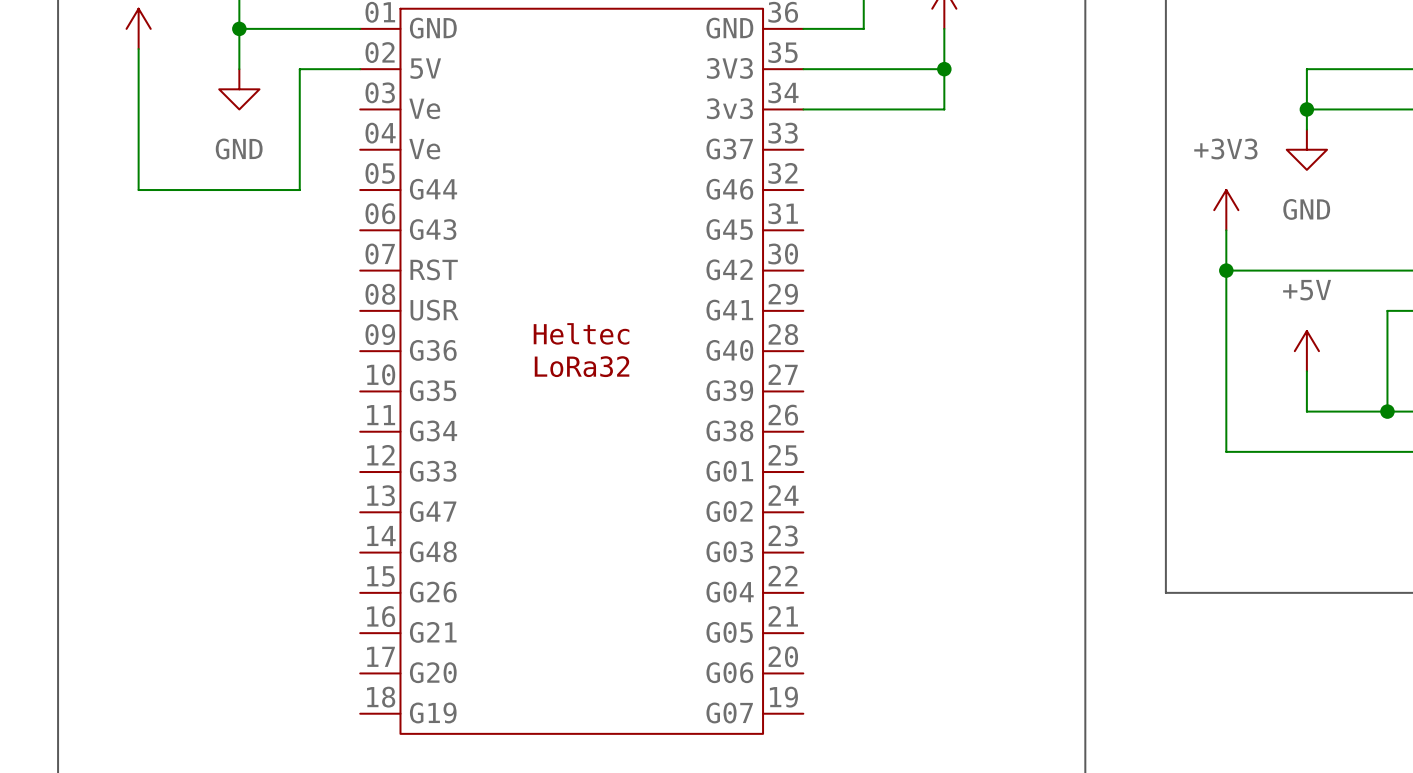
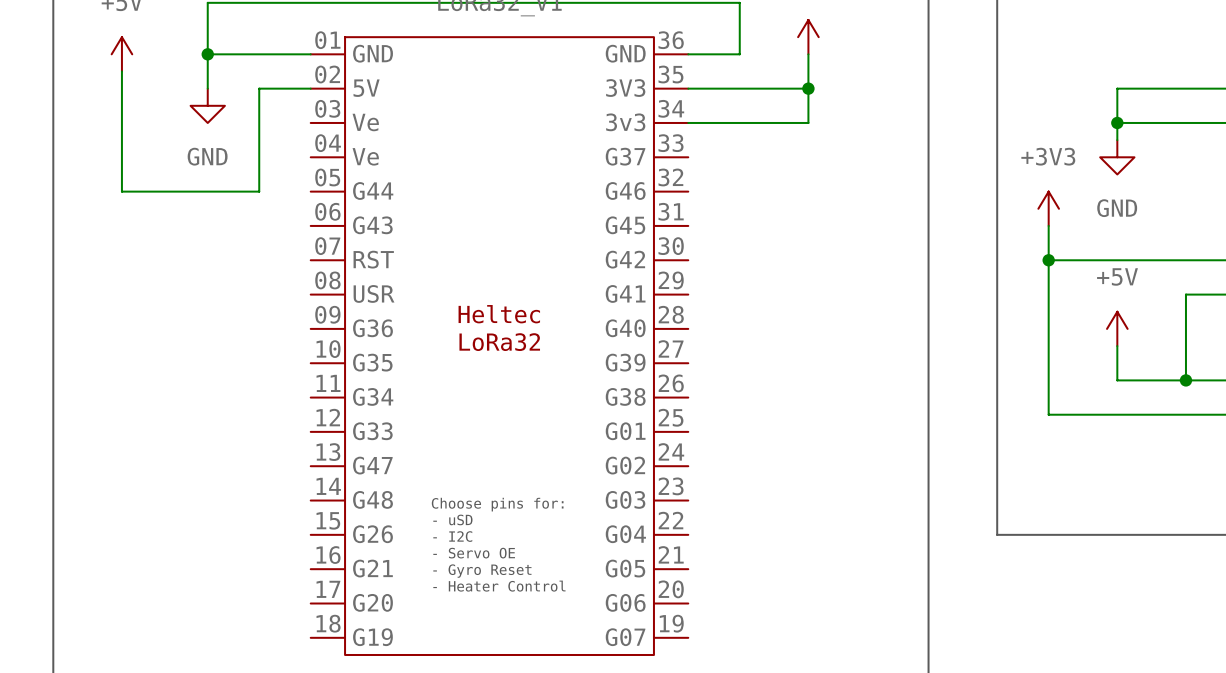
text: none -> Choose pins for: (497, 504)
text: none -> - uSD (452, 519)
text: none -> - I2C (452, 536)
text: none -> - Servo OE (474, 553)
text: none -> - Gyro Reset (482, 571)
text: none -> - Heater Control (499, 586)

